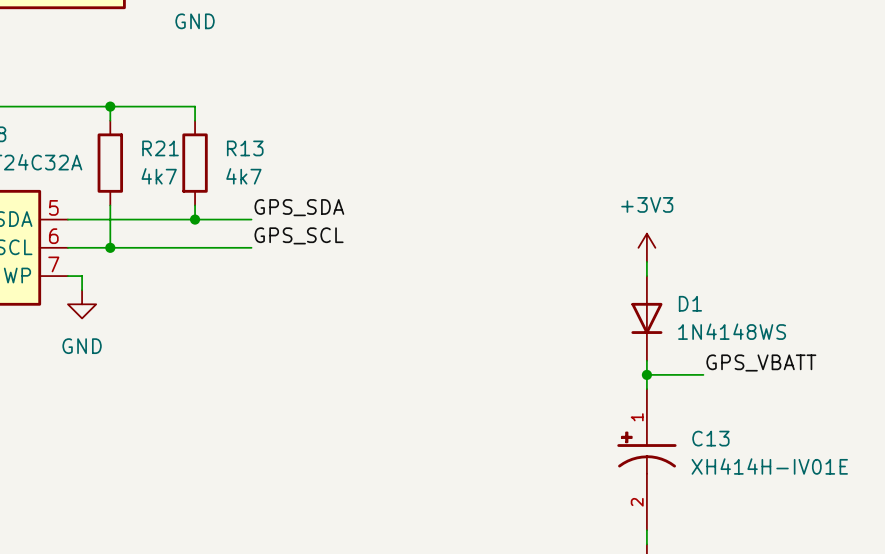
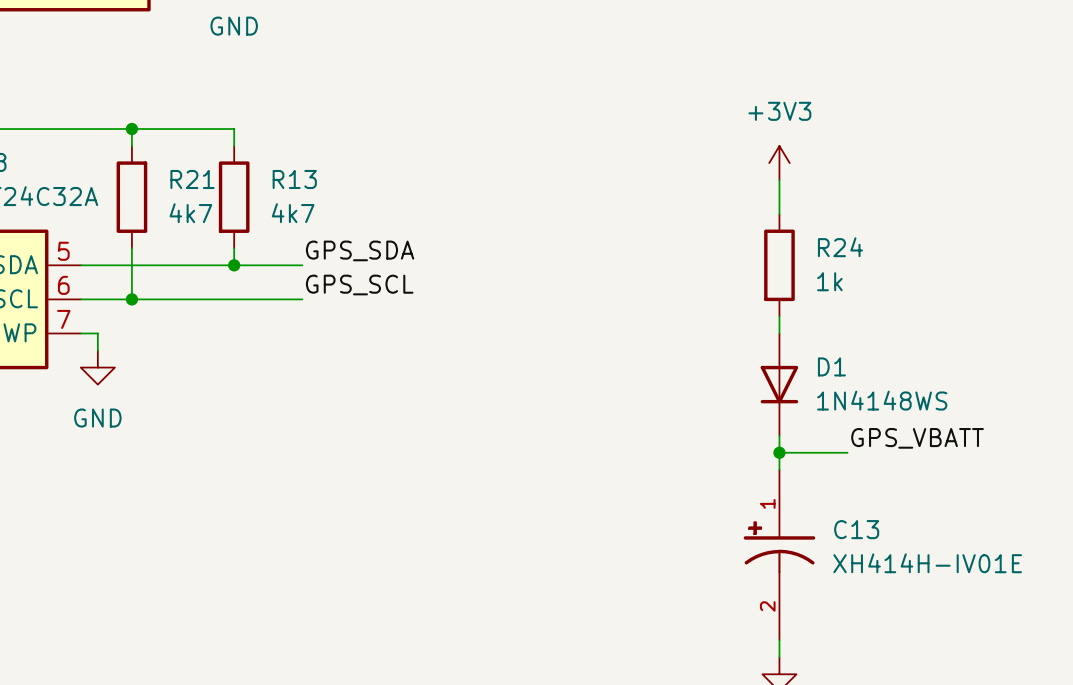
wire: none -> (779, 180) (779, 214)
R24: none -> 1k (779, 265)
power symbol position: +3V3 (646, 247) -> +3V3 (779, 163)

